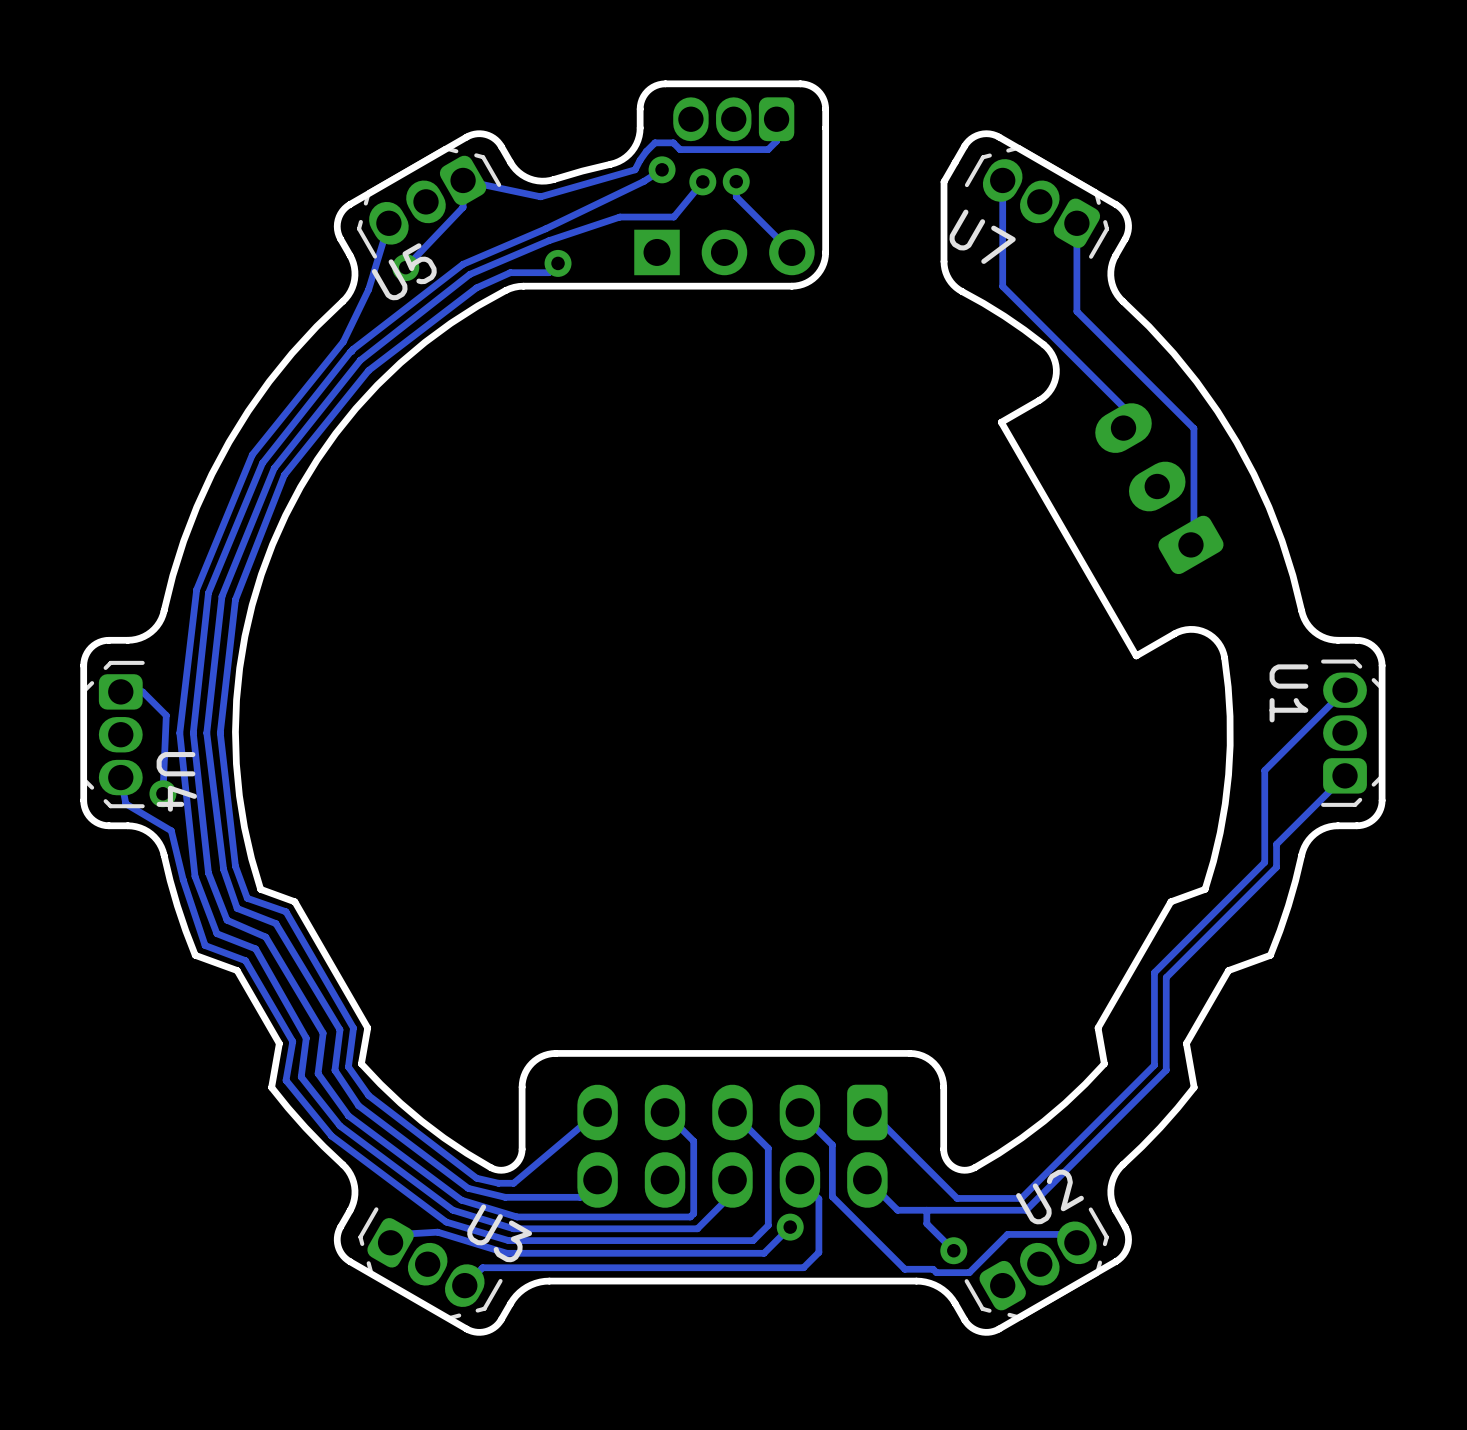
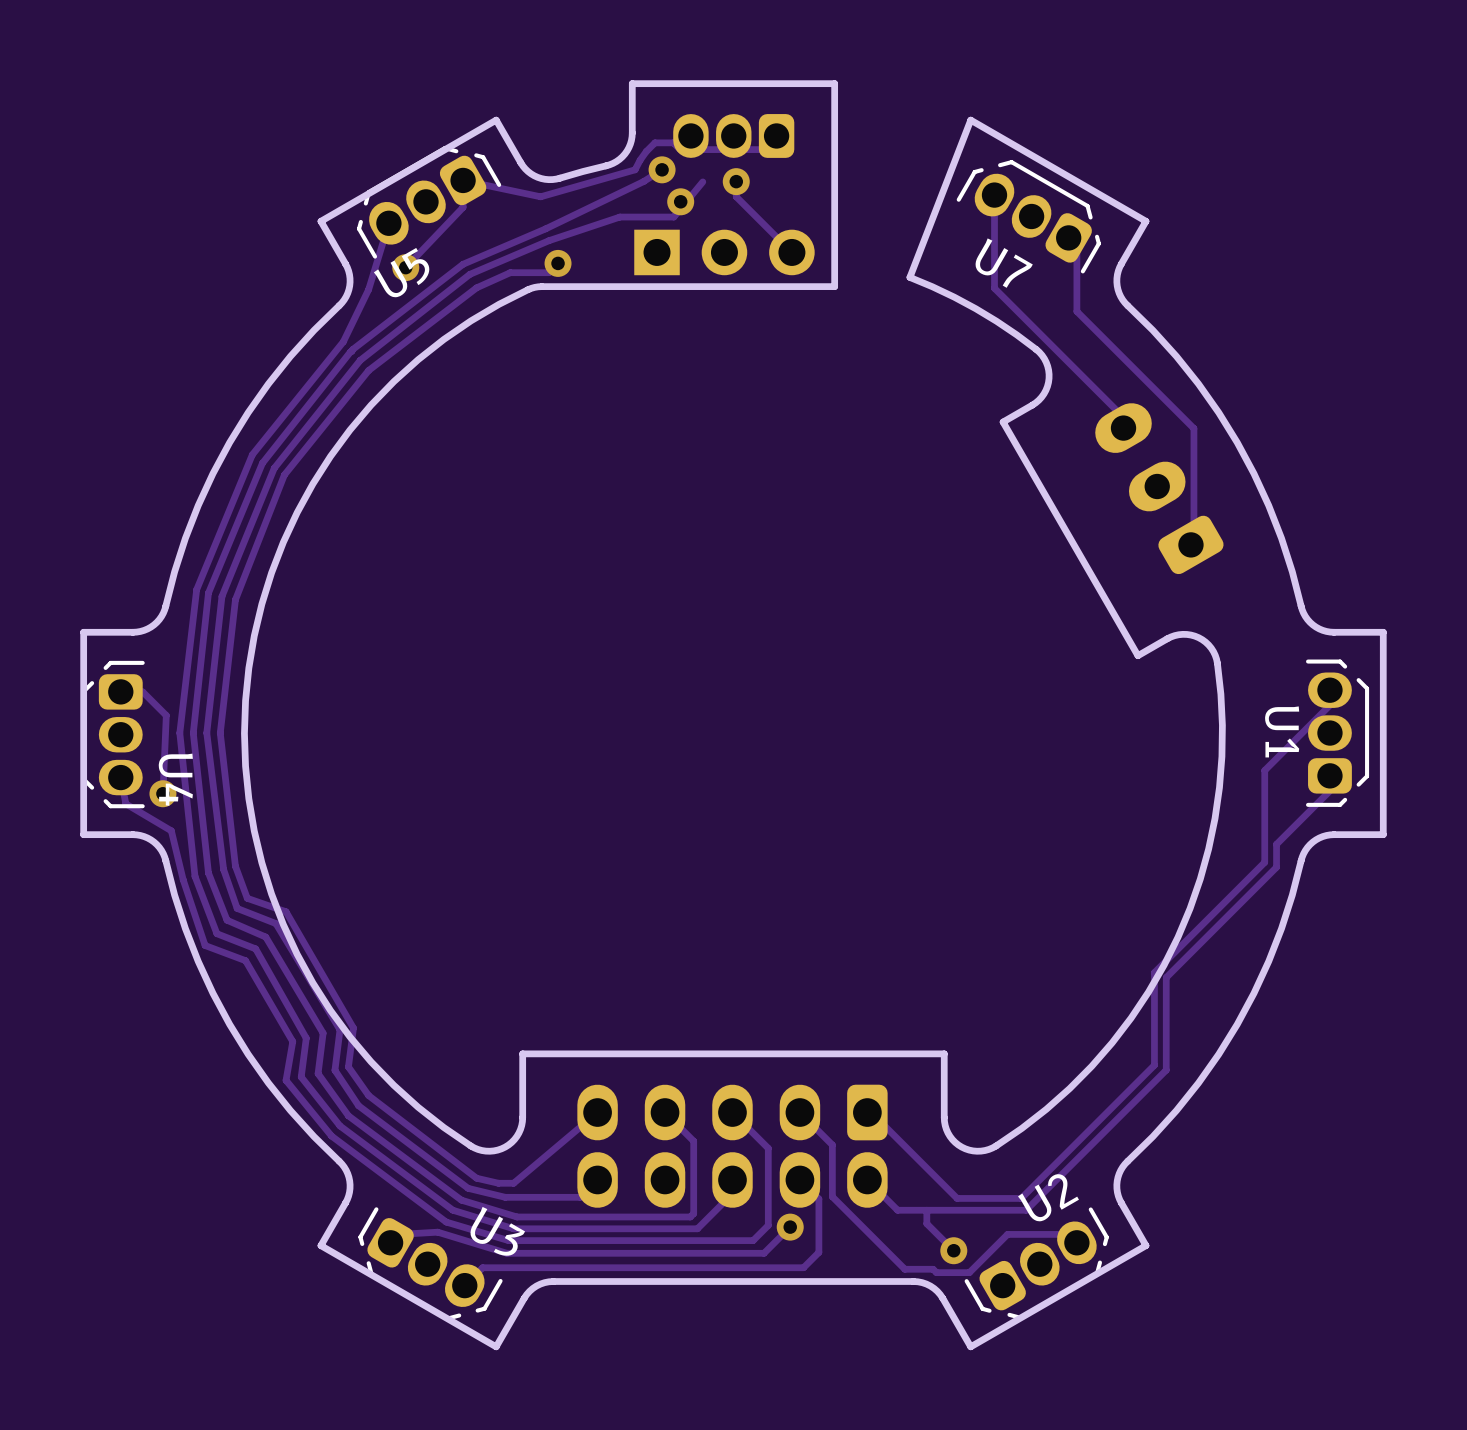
part position: (733, 119) -> (733, 135)
track: (1002, 180) (1002, 286) (1123, 407) (1123, 417) -> (994, 195) (994, 288) (1123, 417)
via position: (702, 181) -> (680, 201)
U7 position: (1036, 202) -> (1028, 216)
U7 name position: U7 (982, 236) -> U7 (1004, 263)
board edge: (83, 665) (87, 652) (96, 643) (105, 640) (136, 639) (147, 634) (157, 626) (162, 615) (172, 575) (196, 507) (229, 442) (269, 381) (292, 353) (350, 291) (354, 279) (354, 267) (339, 236) (337, 226) (340, 213) (347, 206) (471, 134) (485, 134) (495, 139) (512, 166) (525, 177) (537, 180) (550, 180) (614, 163) (629, 154) (639, 136) (642, 99) (647, 91) (655, 85) (665, 83) (803, 83) (818, 91) (824, 100) (825, 109) (825, 256) (822, 267) (812, 278) (803, 284) (791, 286) (523, 286) (505, 290) (450, 323) (400, 362) (377, 385) (355, 408) (317, 459) (285, 515) (261, 574) (244, 636) (236, 699) (235, 731) (239, 795) (244, 827) (260, 889) (294, 901) (367, 1027) (361, 1063) (380, 1084) (421, 1121) (466, 1153) (490, 1167) (501, 1170) (514, 1165) (521, 1154) (522, 1087) (524, 1076) (531, 1063) (548, 1054) (918, 1054) (930, 1060) (941, 1074) (943, 1087) (944, 1154) (951, 1165) (964, 1170) (974, 1167) (998, 1153) (1044, 1121) (1065, 1103) (1104, 1063) (1098, 1027) (1170, 901) (1205, 889) (1213, 861) (1225, 803) (1230, 745) (1230, 716) (1224, 658) (1215, 639) (1205, 632) (1194, 629) (1178, 632) (1136, 655) (1001, 422) (1046, 395) (1053, 385) (1056, 369) (1053, 357) (1043, 344) (1004, 316) (959, 289) (950, 282) (945, 272) (944, 261) (944, 181) (966, 143) (979, 134) (989, 133) (999, 137) (1115, 204) (1124, 212) (1127, 219) (1128, 231) (1113, 259) (1110, 271) (1115, 291) (1173, 353) (1196, 381) (1236, 442) (1269, 507) (1292, 575) (1302, 615) (1308, 626) (1318, 634) (1329, 639) (1366, 642) (1374, 647) (1380, 655) (1382, 665) (1382, 800) (1378, 813) (1367, 823) (1359, 825) (1329, 826) (1318, 831) (1308, 839) (1302, 851) (1288, 905) (1270, 955) (1228, 970) (1186, 1043) (1194, 1087) (1160, 1127) (1120, 1167) (1112, 1182) (1112, 1202) (1128, 1236) (1127, 1246) (1123, 1255) (1115, 1261) (999, 1329) (985, 1332) (977, 1330) (967, 1324) (952, 1299) (942, 1289) (930, 1283) (916, 1281) (544, 1281) (523, 1289) (513, 1299) (495, 1326) (485, 1331) (477, 1332) (466, 1329) (349, 1261) (340, 1251) (337, 1237) (339, 1229) (353, 1202) (353, 1182) (345, 1167) (305, 1127) (271, 1087) (279, 1043) (237, 970) (195, 955) (177, 905) (162, 851) (157, 839) (147, 831) (136, 826) (105, 825) (96, 822) (87, 813) (83, 800) -> (83, 665) (83, 632) (136, 632) (147, 628) (159, 619) (164, 609) (174, 571) (198, 505) (229, 442) (268, 383) (290, 356) (346, 296) (349, 285) (348, 270) (320, 221) (496, 120) (525, 168) (537, 177) (552, 179) (609, 164) (624, 154) (632, 136) (632, 83) (834, 83) (834, 286) (541, 286) (528, 289) (470, 320) (443, 339) (393, 381) (349, 430) (330, 456) (297, 512) (271, 572) (254, 635) (245, 700) (245, 766) (254, 830) (271, 894) (297, 954) (330, 1010) (371, 1061) (418, 1107) (470, 1145) (489, 1151) (508, 1144) (520, 1129) (522, 1117) (522, 1053) (944, 1053) (944, 1117) (946, 1129) (952, 1139) (961, 1147) (973, 1150) (985, 1150) (996, 1145) (1021, 1128) (1069, 1088) (1112, 1042) (1131, 1018) (1164, 965) (1178, 937) (1200, 879) (1208, 849) (1219, 787) (1221, 756) (1220, 694) (1217, 663) (1208, 644) (1198, 637) (1186, 634) (1170, 637) (1137, 655) (1003, 422) (1035, 402) (1043, 393) (1049, 378) (1044, 358) (1036, 349) (996, 321) (954, 297) (909, 277) (970, 120) (1146, 221) (1119, 267) (1116, 282) (1119, 293) (1125, 302) (1152, 330) (1198, 383) (1237, 442) (1268, 505) (1281, 538) (1305, 616) (1316, 627) (1326, 631) (1383, 632) (1383, 834) (1330, 834) (1319, 838) (1307, 847) (1302, 857) (1292, 895) (1268, 961) (1237, 1024) (1198, 1083) (1176, 1110) (1120, 1170) (1116, 1184) (1118, 1196) (1146, 1245) (970, 1346) (940, 1294) (930, 1286) (913, 1281) (548, 1281) (536, 1286) (526, 1294) (496, 1346) (320, 1245) (348, 1196) (350, 1184) (346, 1170) (290, 1110) (268, 1083) (229, 1024) (198, 961) (174, 895) (164, 857) (159, 847) (150, 839) (136, 834) (83, 834) (83, 800)
U1 name position: U1 (1288, 693) -> U1 (1282, 731)
U1 position: (1352, 733) -> (1337, 733)

